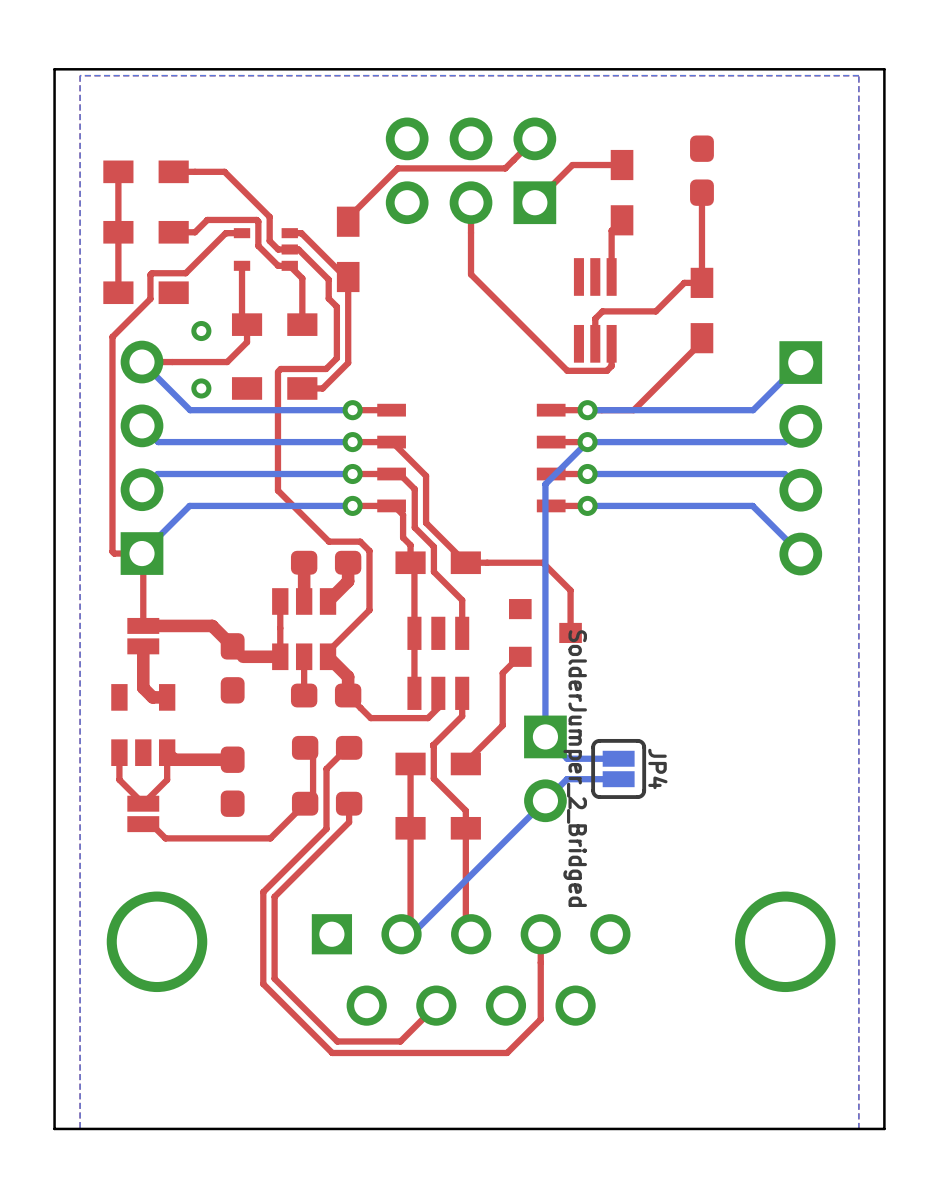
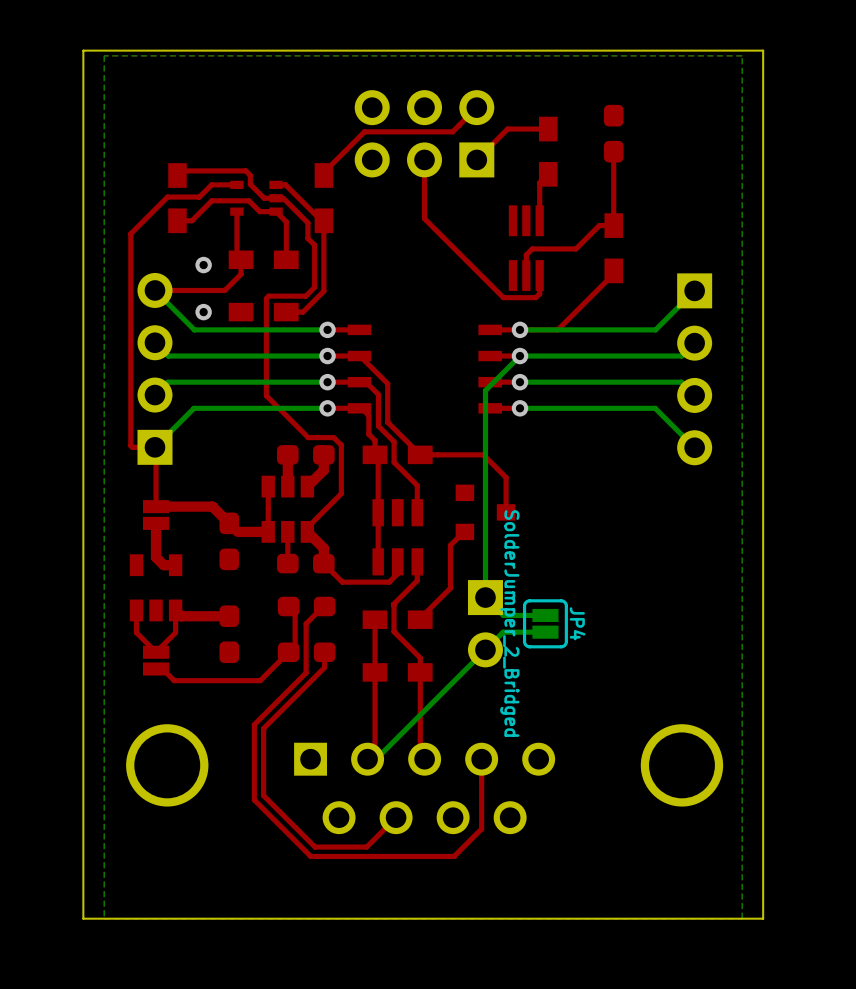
top track: (118, 171) (118, 292) -> none
part: (146, 171) -> none
top track: (173, 171) (224, 171) (269, 216) (269, 240) (278, 249) -> none
top track: (256, 219) (207, 219) (195, 232) (173, 232) -> (248, 174) (245, 170) (182, 170) (177, 175)
part: (146, 232) -> none
top track: (258, 232) (258, 245) (278, 265) -> (250, 184) (264, 198) (266, 198)
top track: (225, 233) (185, 273) (152, 273) (150, 274) (150, 298) (112, 336) -> (223, 184) (211, 184) (199, 197) (167, 197) (130, 233) (130, 269)
part: none -> (177, 198)
top track: none -> (266, 211) (259, 211) (248, 200) (211, 200) (191, 220) (177, 220)
part: (146, 292) -> none

